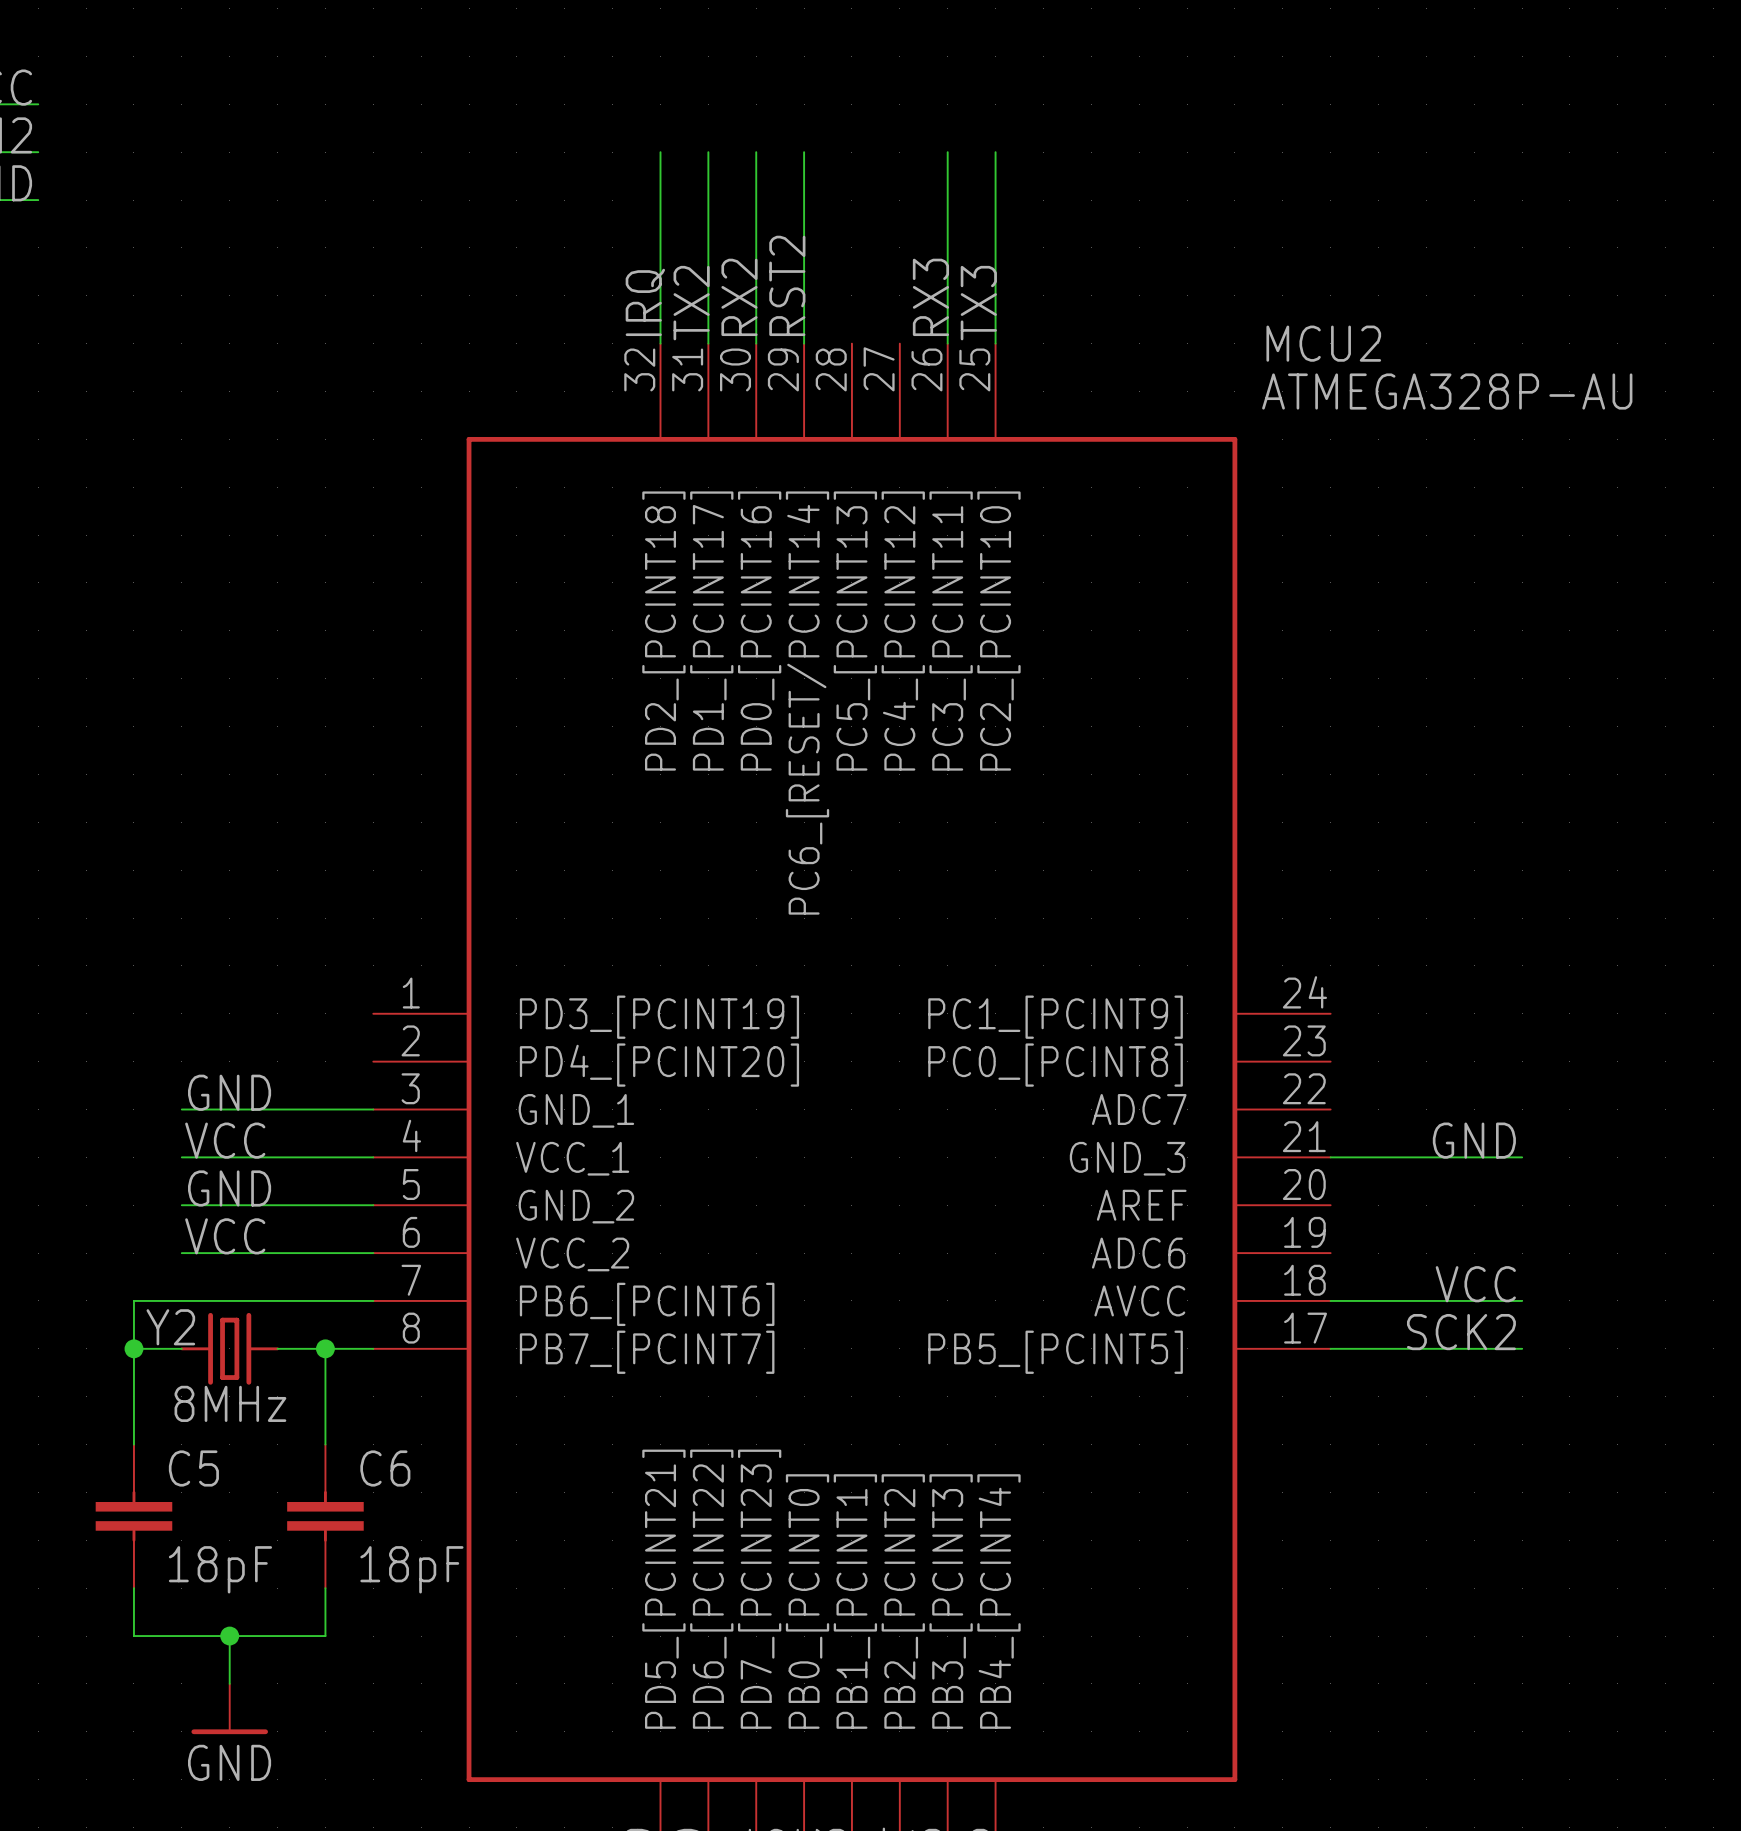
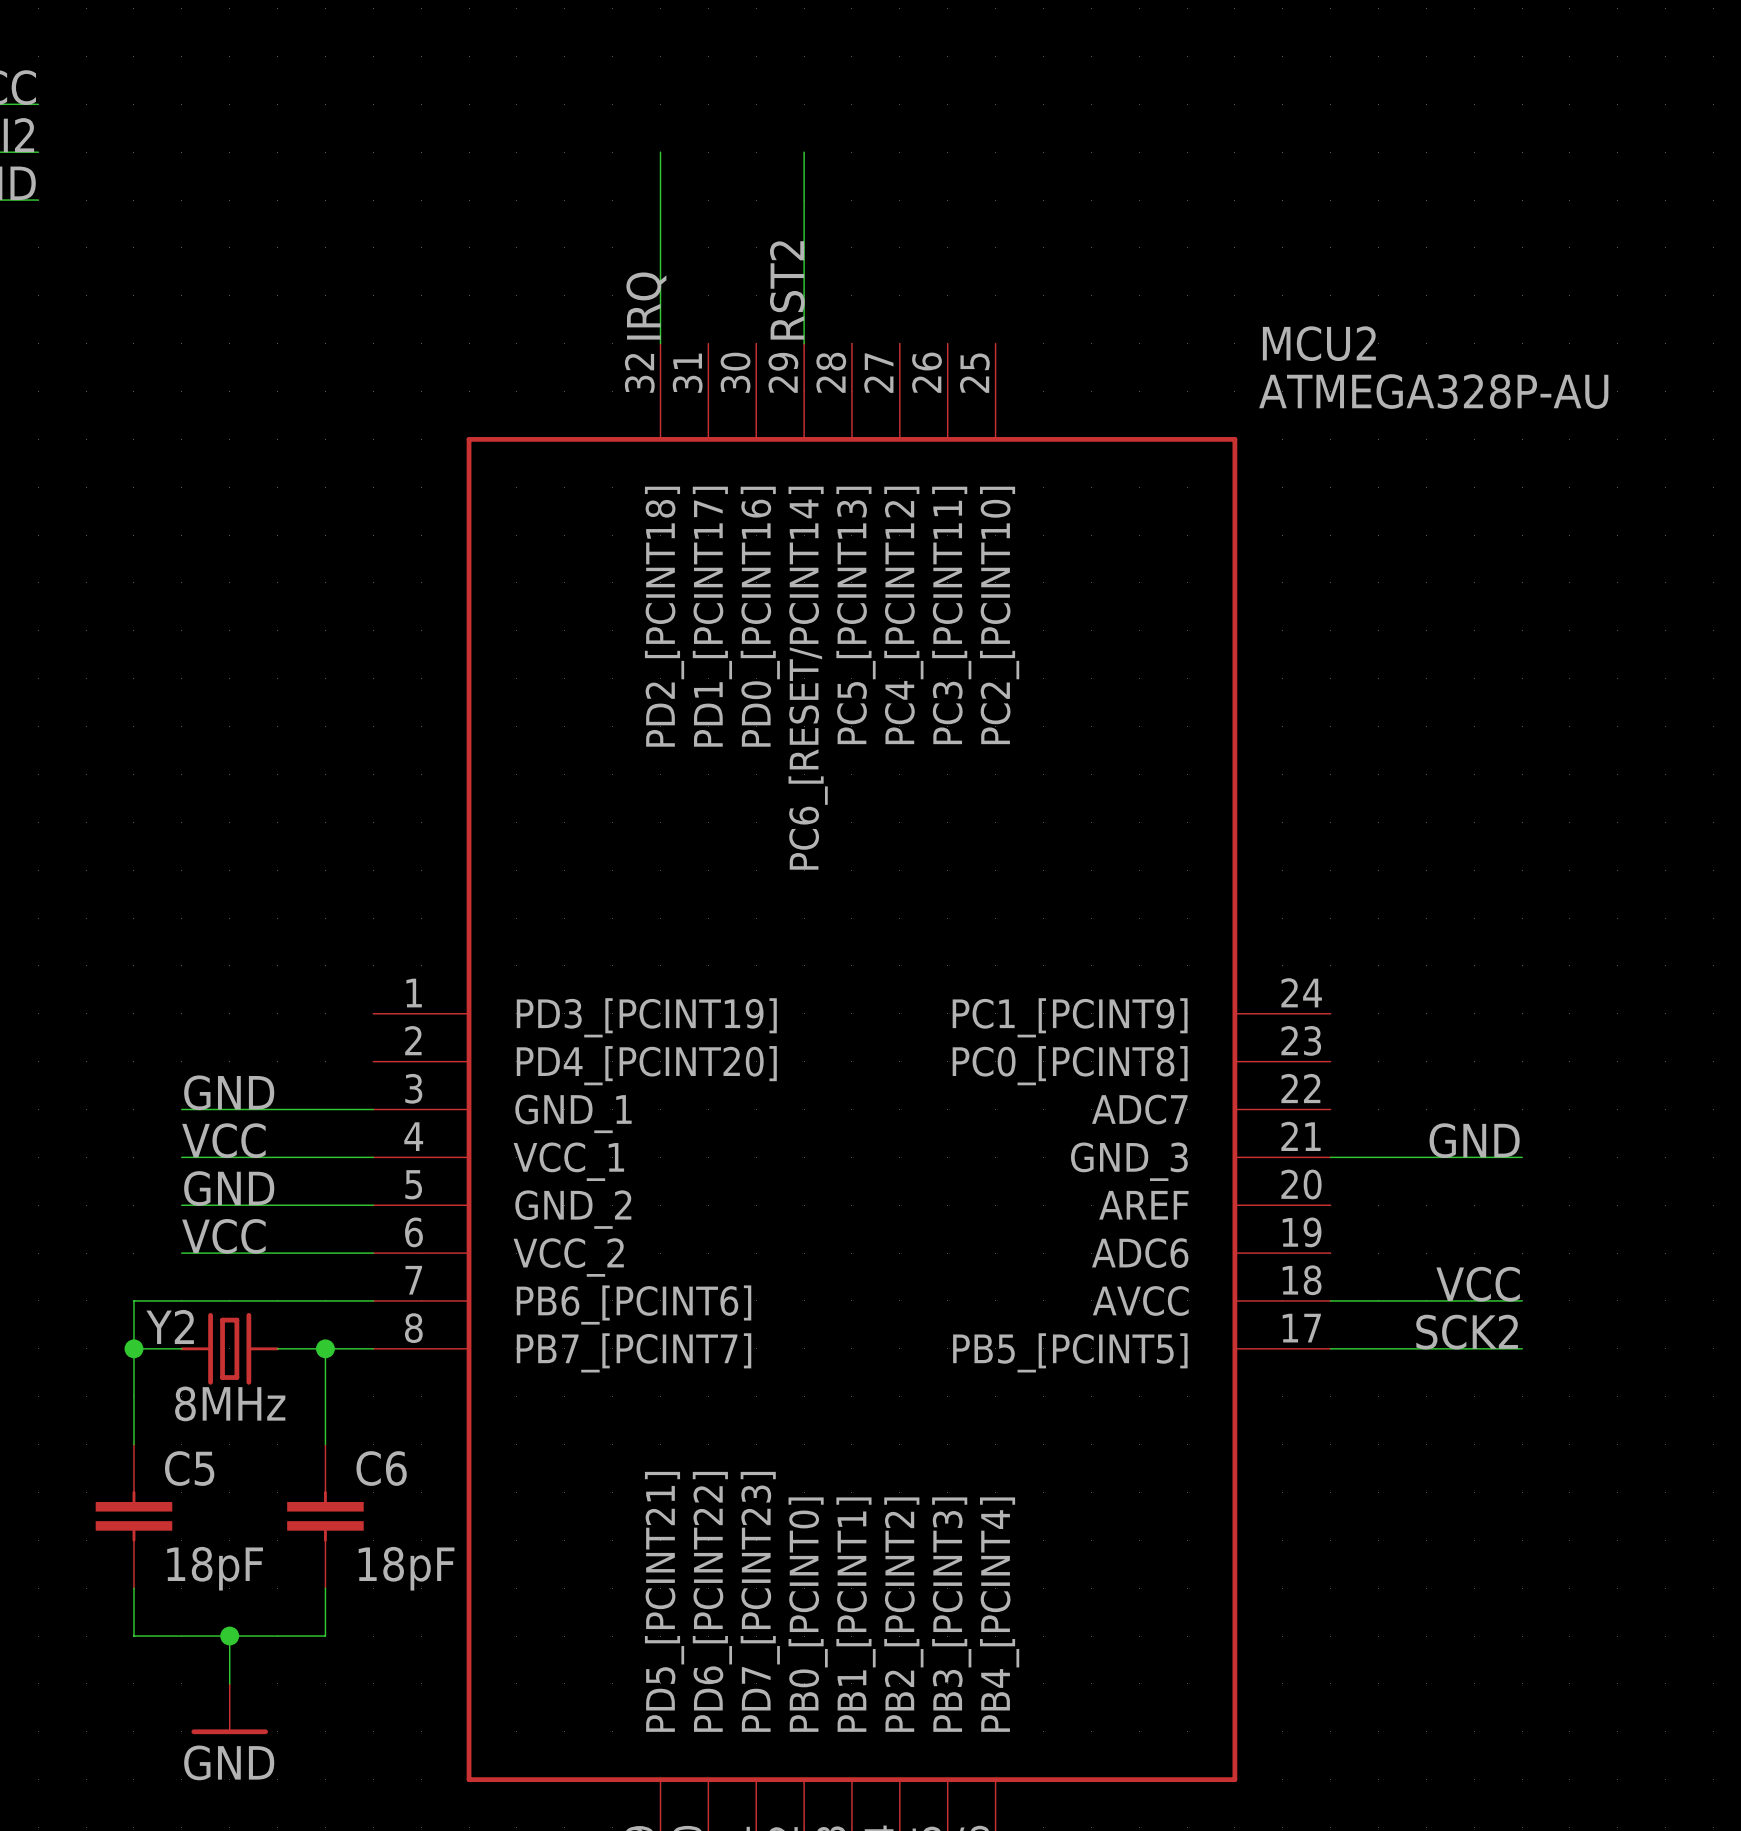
wire: (708, 152) (708, 343) -> none
wire: (756, 152) (756, 343) -> none
wire: (947, 152) (947, 343) -> none
wire: (995, 152) (995, 343) -> none
label: RX2 (739, 297) -> none
label: RX3 (930, 297) -> none
label: TX2 (691, 303) -> none
label: TX3 (978, 303) -> none

